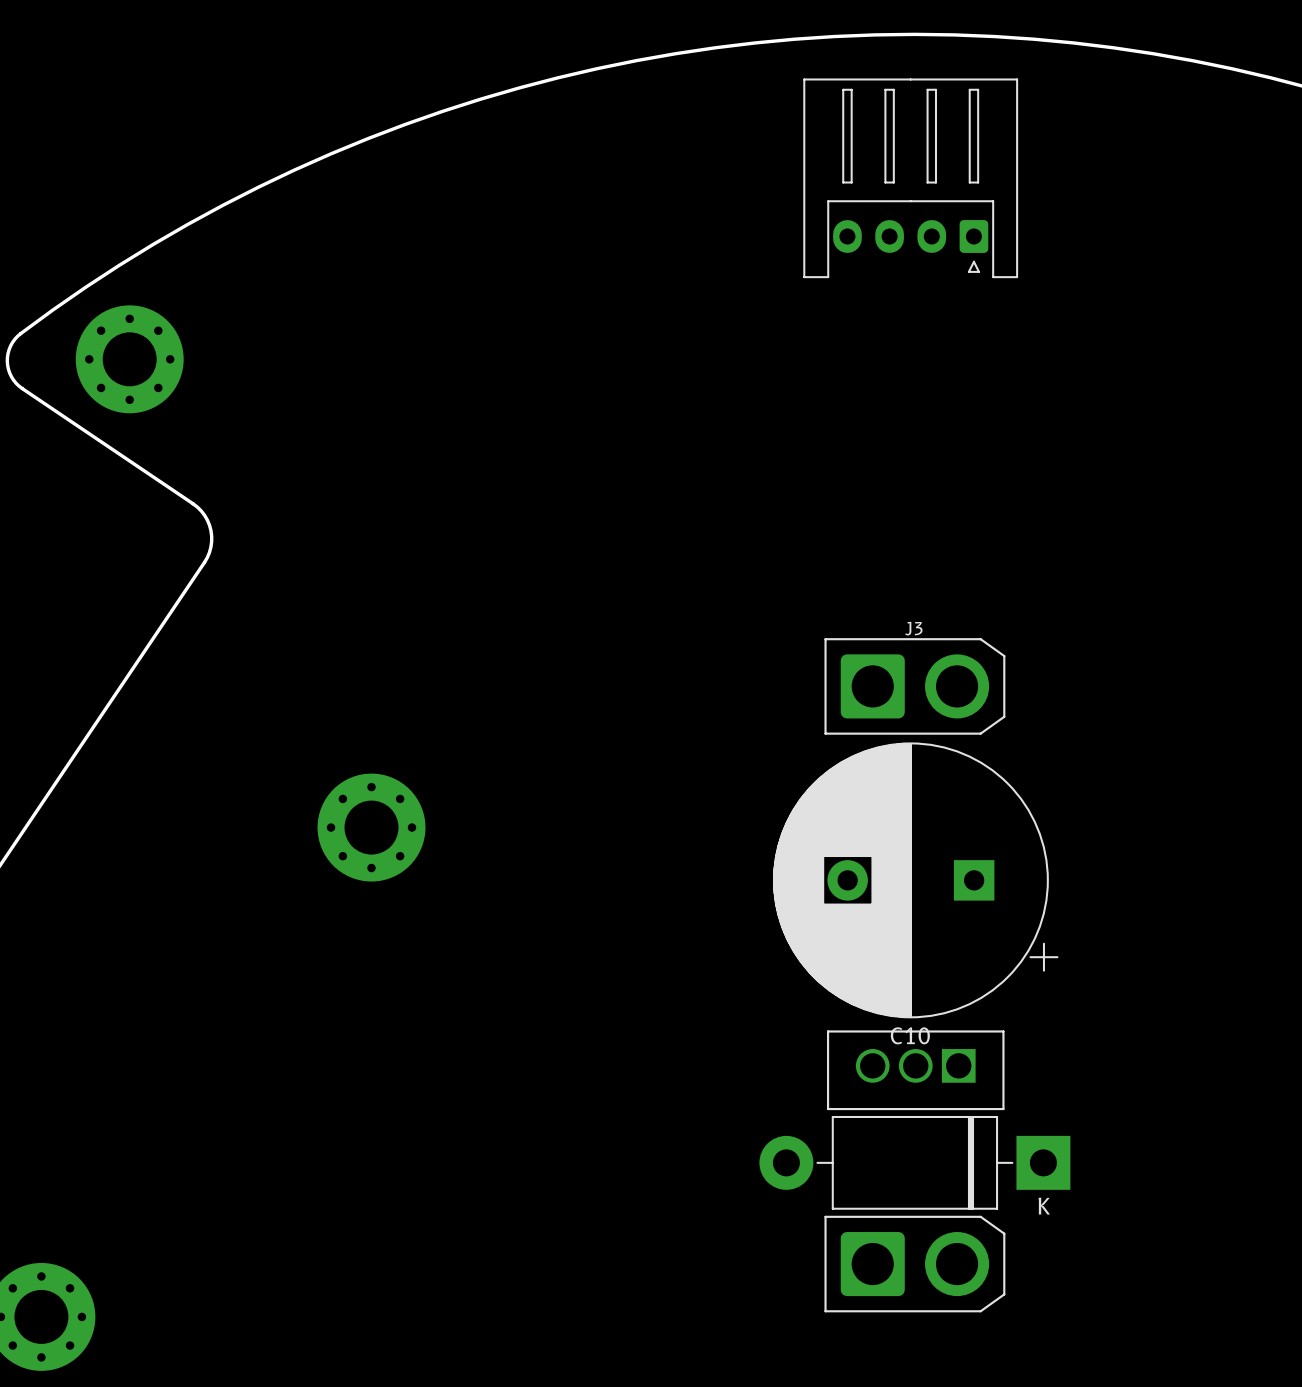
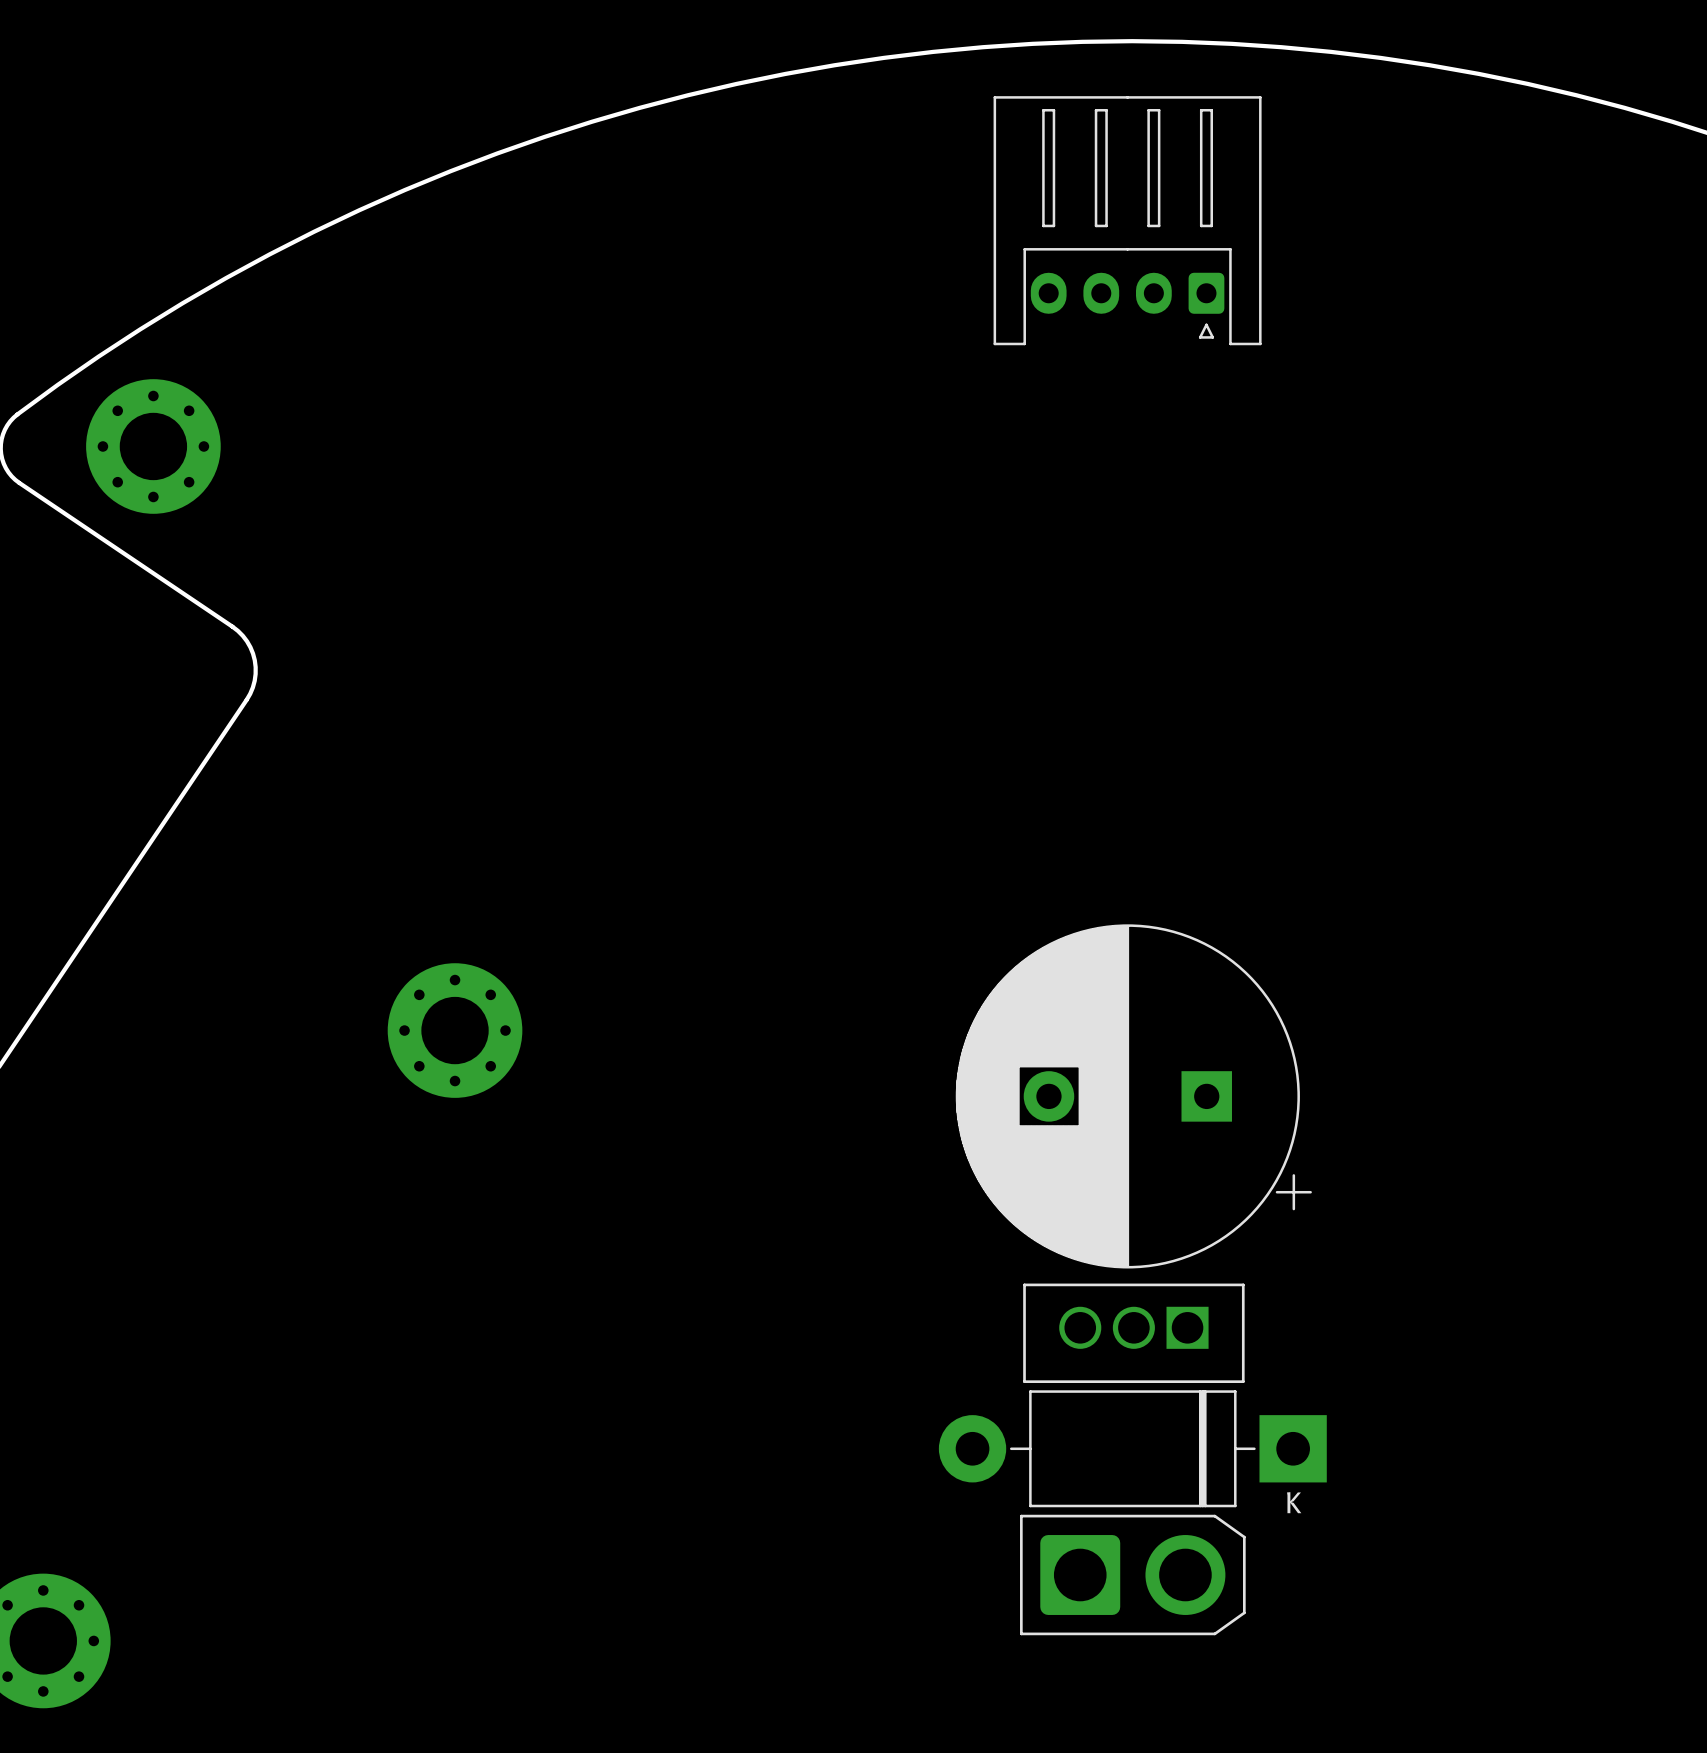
J3: (914, 686) -> none
C10 name: C10 (910, 1035) -> none

